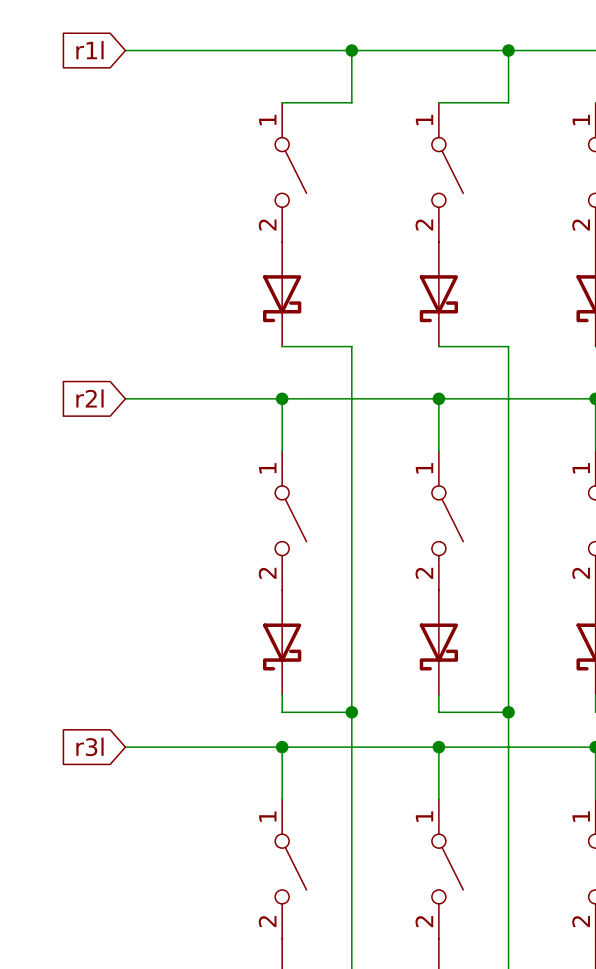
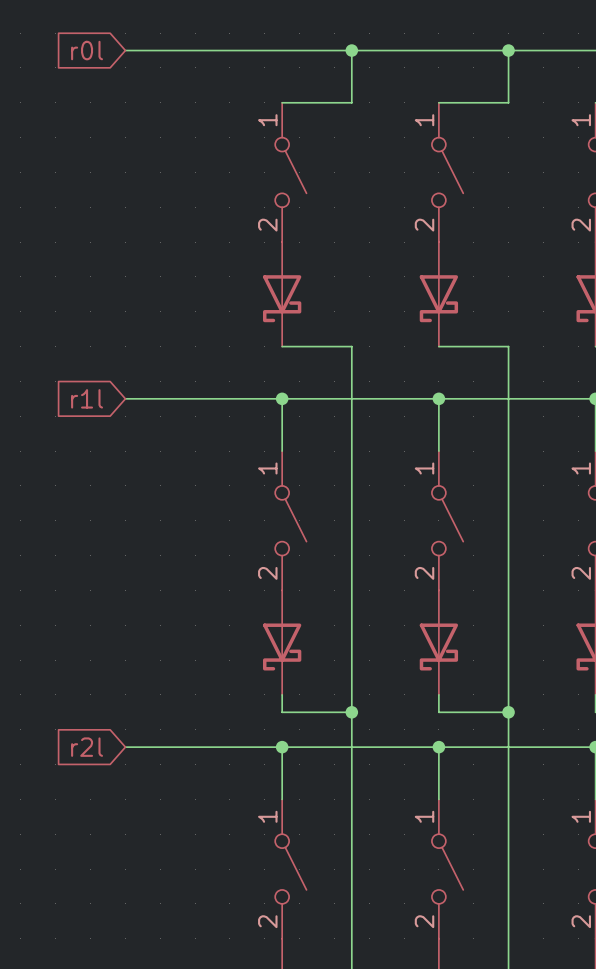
global label: r1l (89, 50) -> r0l (87, 50)
global label: r2l (89, 398) -> r1l (87, 398)
global label: r3l (89, 746) -> r2l (87, 747)

